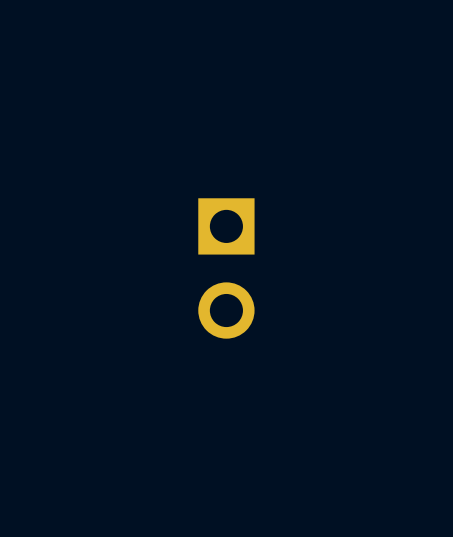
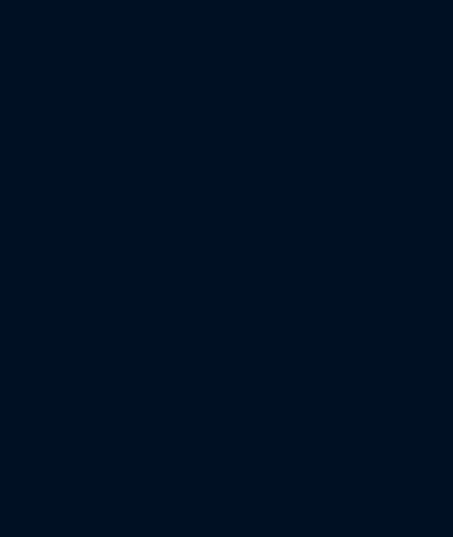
part: (226, 268) -> none

